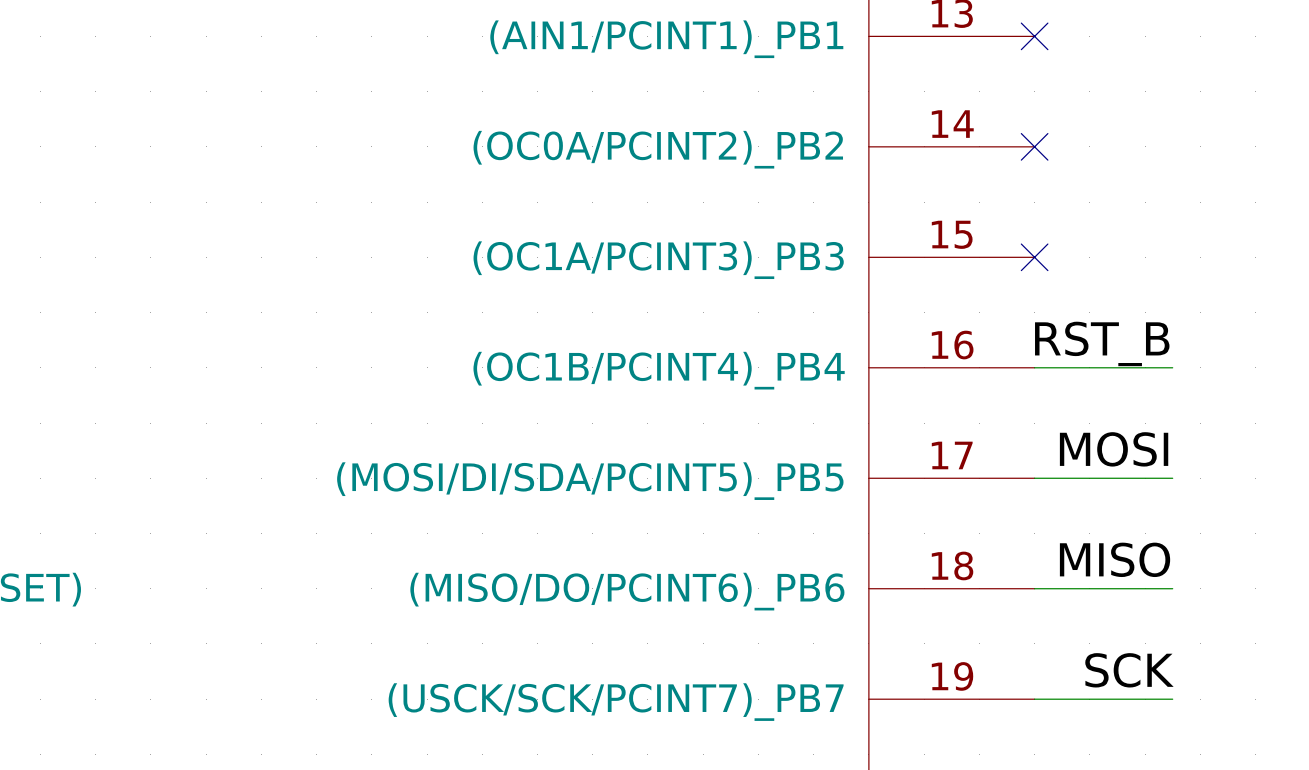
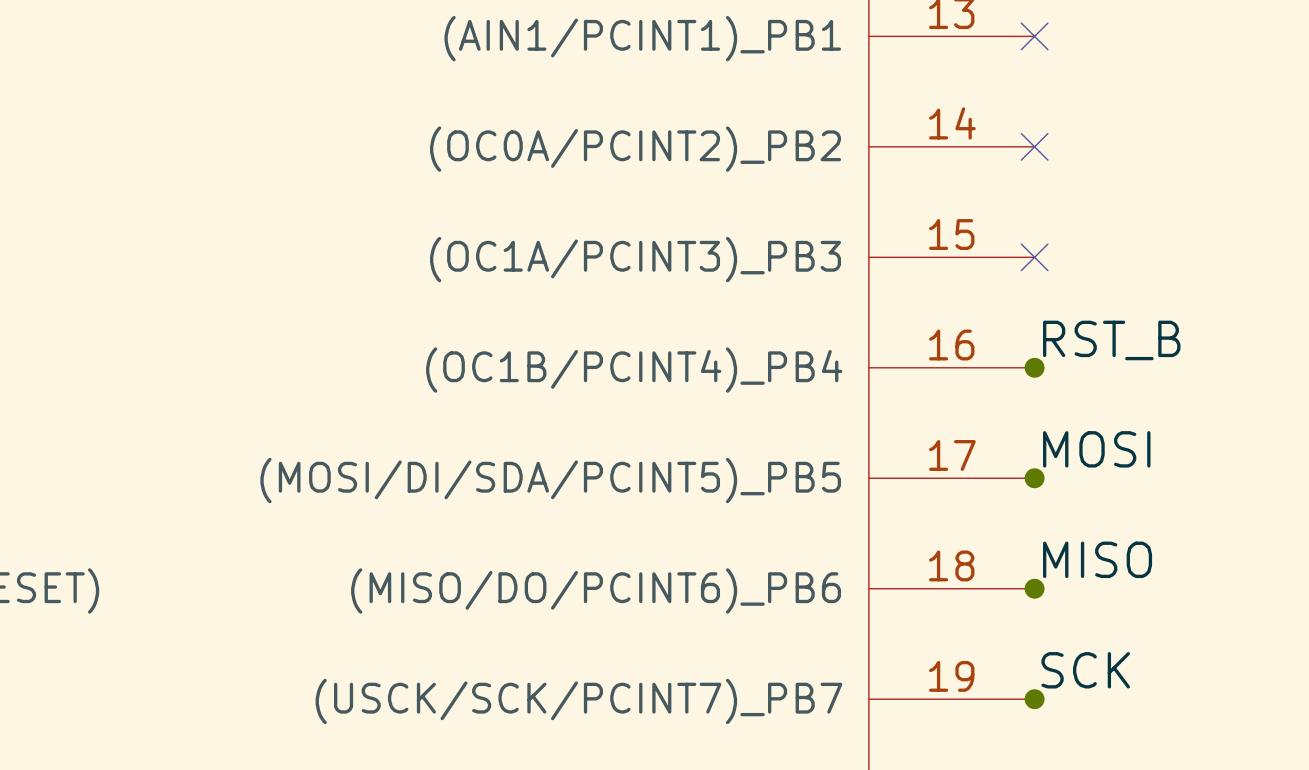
label position: RST_B (1102, 343) -> RST_B (1111, 340)
wire: (1034, 367) (1172, 367) -> none
junction: none -> (1034, 367)
label position: MOSI (1114, 449) -> MOSI (1096, 449)
wire: (1034, 478) (1172, 478) -> none
junction: none -> (1034, 478)
label position: MISO (1115, 559) -> MISO (1097, 559)
wire: (1034, 588) (1172, 588) -> none
junction: none -> (1034, 588)
label position: SCK (1129, 670) -> SCK (1085, 670)
wire: (1034, 699) (1172, 699) -> none
junction: none -> (1034, 699)

